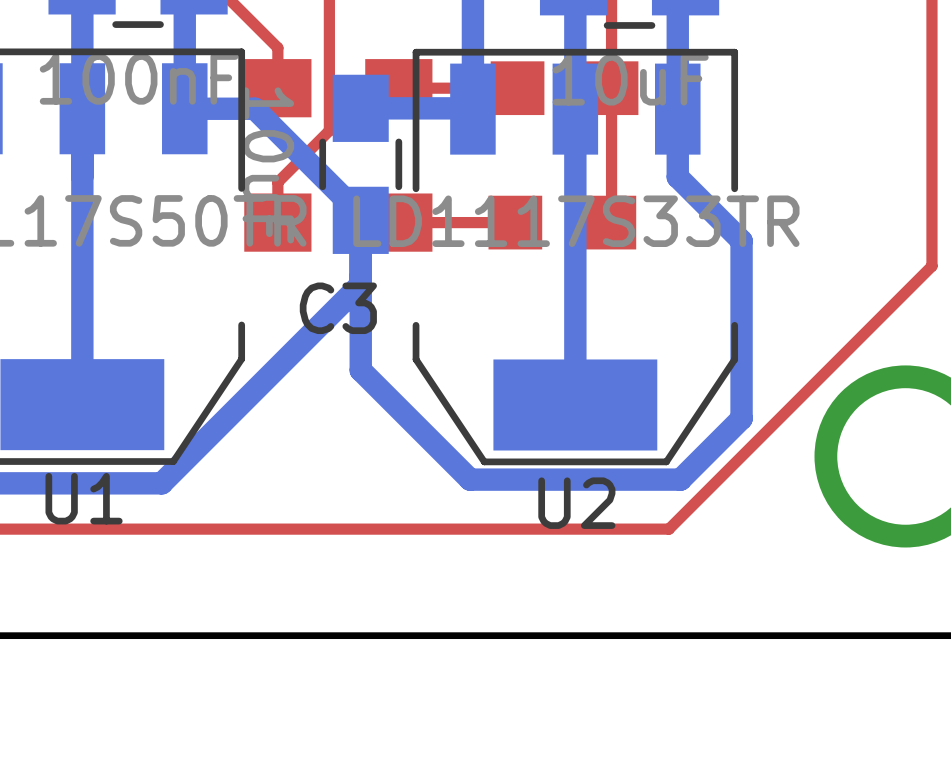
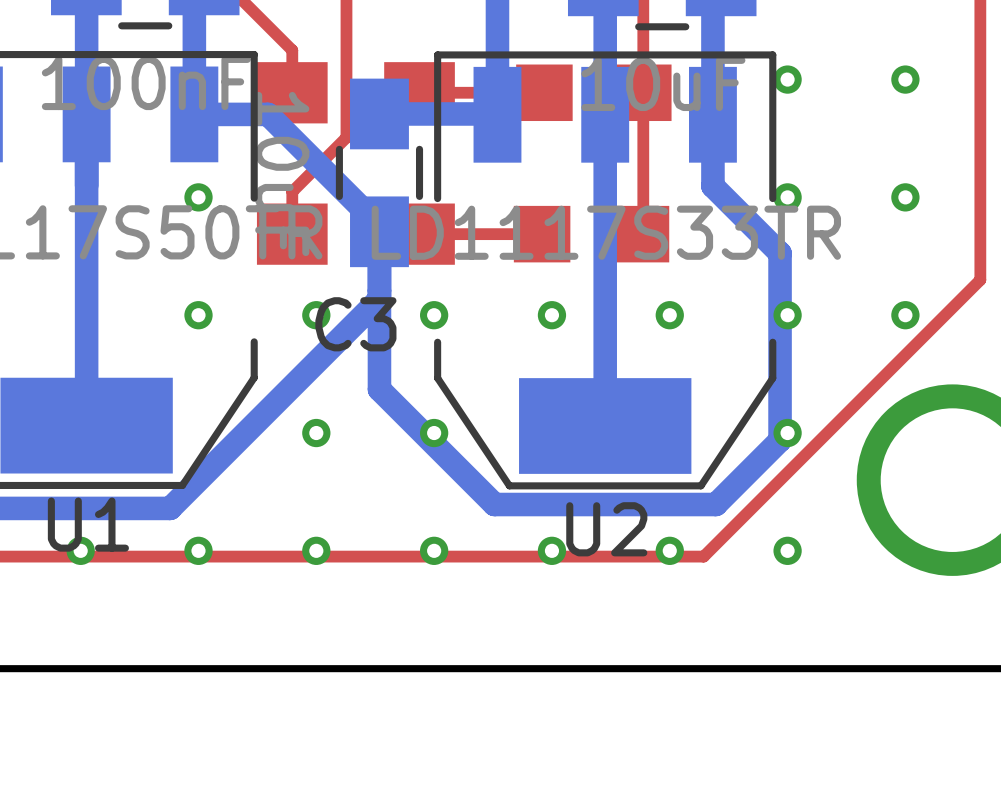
part: none -> (787, 79)
part: none -> (905, 79)
part: none -> (198, 197)
part: none -> (787, 197)
part: none -> (905, 197)
part: none -> (198, 315)
part: none -> (316, 315)
part: none -> (434, 315)
part: none -> (551, 315)
part: none -> (669, 315)
part: none -> (787, 315)
part: none -> (905, 315)
part: none -> (316, 433)
part: none -> (434, 433)
part: none -> (787, 433)
part: none -> (80, 550)
part: none -> (198, 550)
part: none -> (316, 550)
part: none -> (434, 550)
part: none -> (551, 550)
part: none -> (669, 550)
part: none -> (787, 550)

